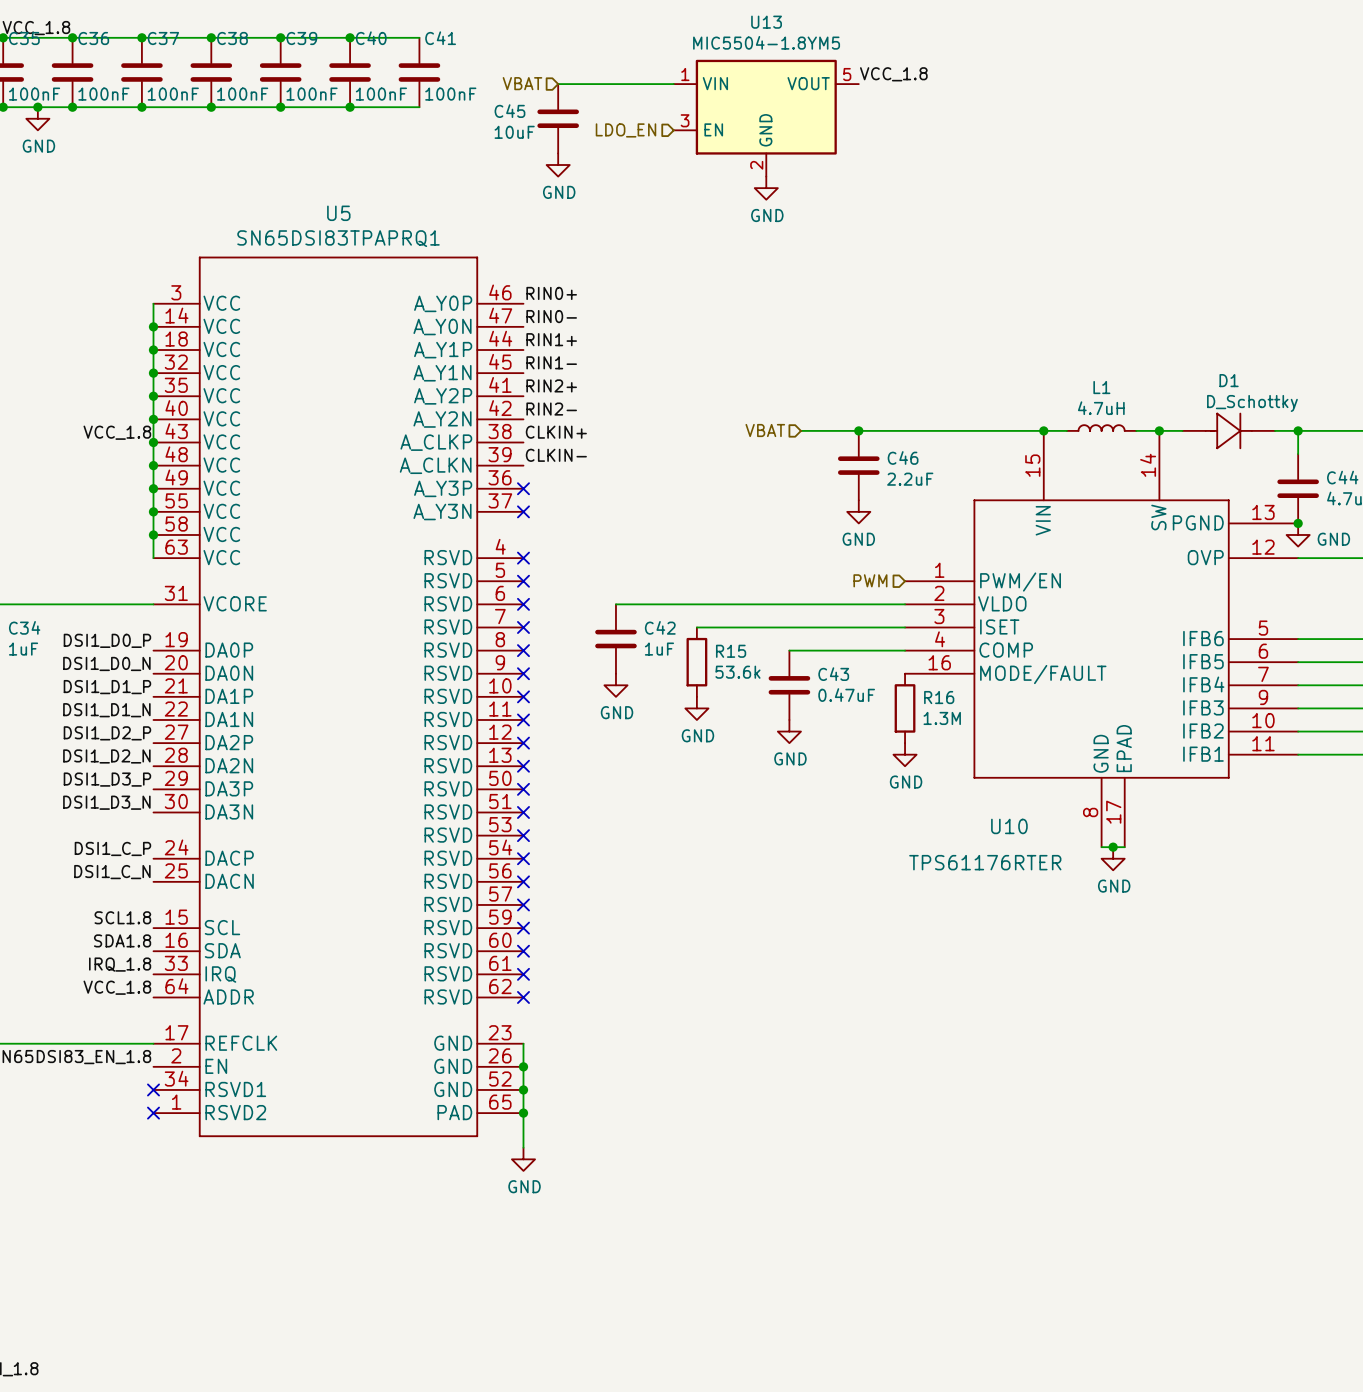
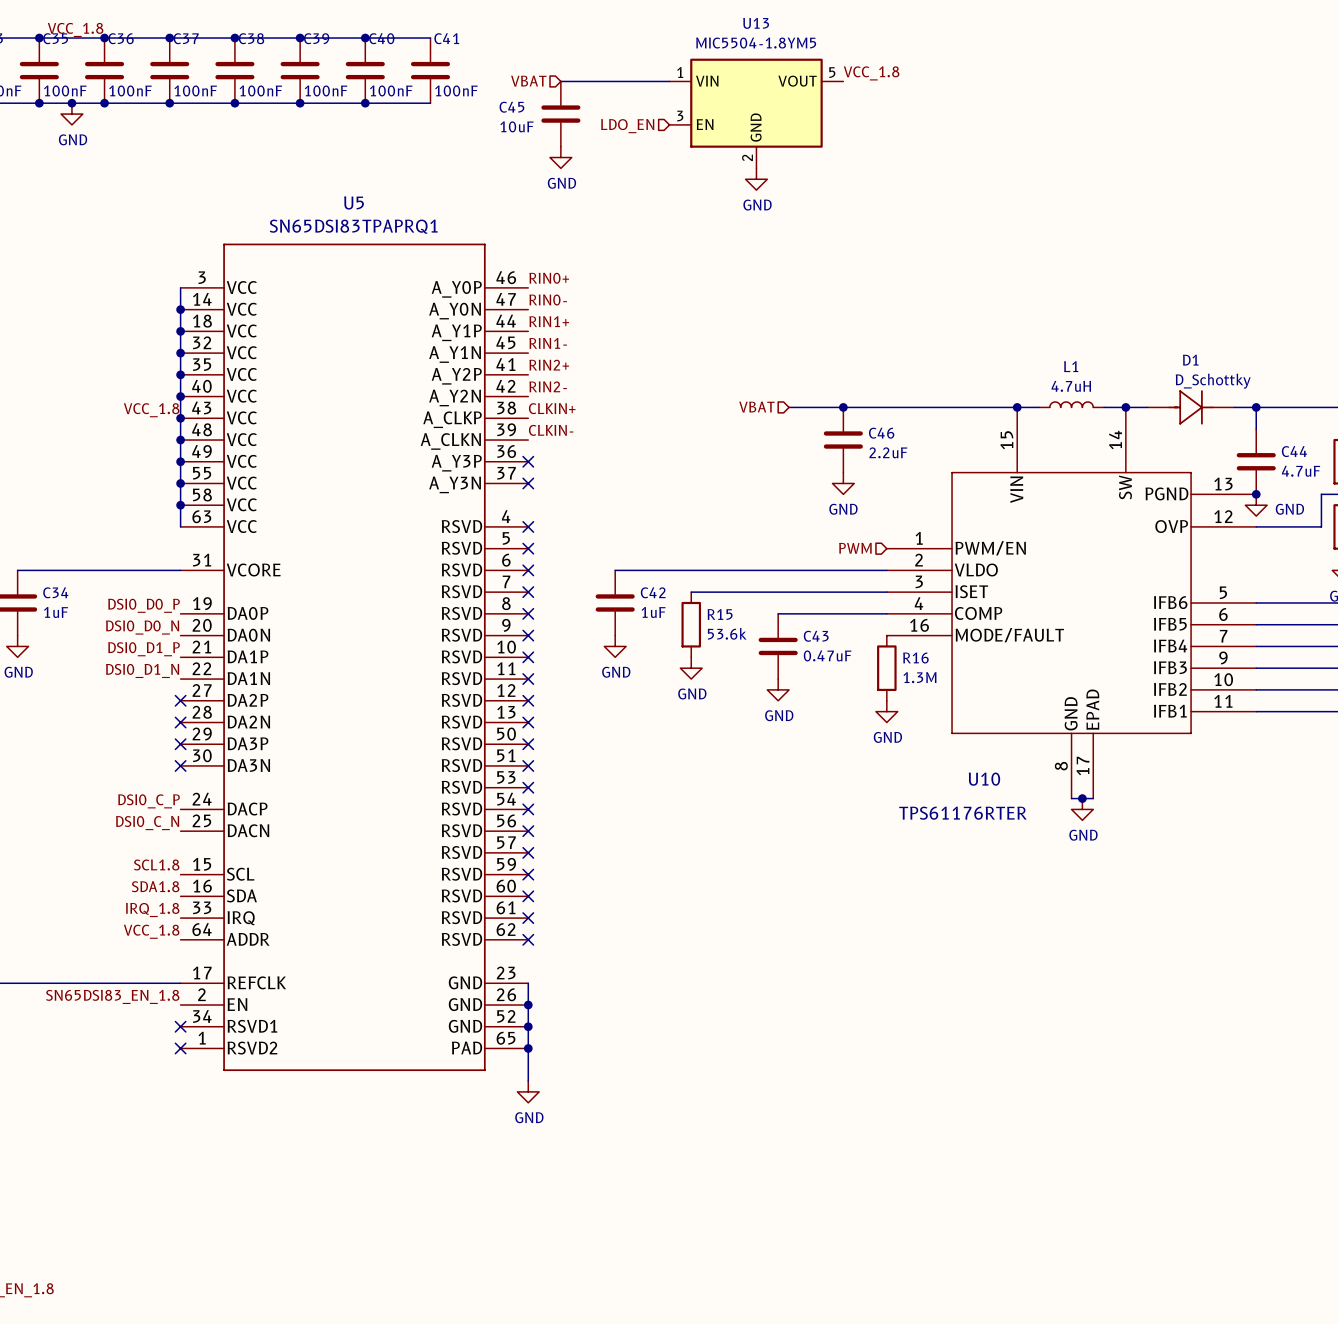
label: DSI1_D0_P (107, 640) -> DSI0_D0_P (144, 605)
label: DSI1_D0_N (106, 663) -> DSI0_D0_N (142, 627)
label: DSI1_D1_P (107, 687) -> DSI0_D1_P (144, 649)
label: DSI1_D1_N (106, 710) -> DSI0_D1_N (142, 670)
label: DSI1_D2_P (107, 733) -> none
no-connect mark: none -> (180, 700)
label: DSI1_D2_N (106, 756) -> none
no-connect mark: none -> (180, 722)
label: DSI1_D3_P (107, 779) -> none
no-connect mark: none -> (180, 744)
label: DSI1_D3_N (106, 802) -> none
no-connect mark: none -> (180, 765)
label: DSI1_C_P (112, 848) -> DSI0_C_P (149, 801)
label: DSI1_C_N (112, 872) -> DSI0_C_N (147, 823)

